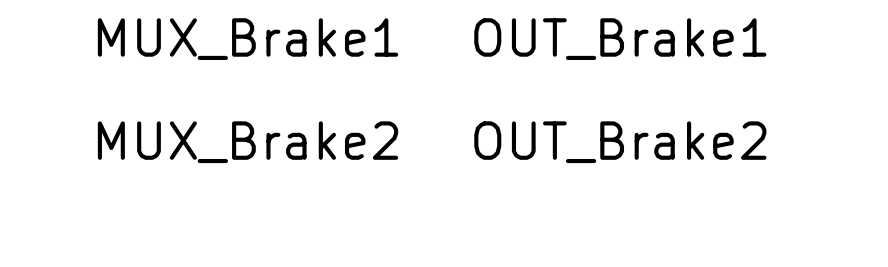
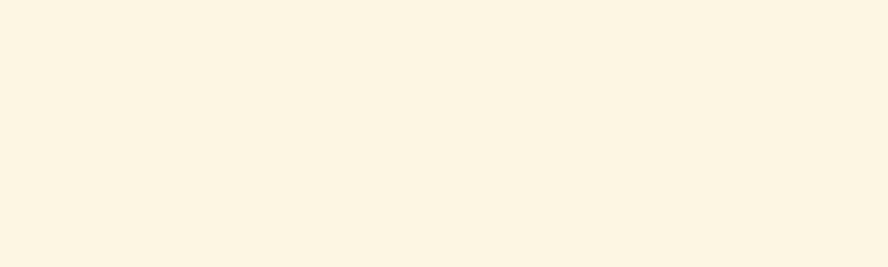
label: MUX_Brake1 (248, 39) -> none
label: OUT_Brake1 (620, 39) -> none
label: MUX_Brake2 (248, 142) -> none
label: OUT_Brake2 (620, 142) -> none

